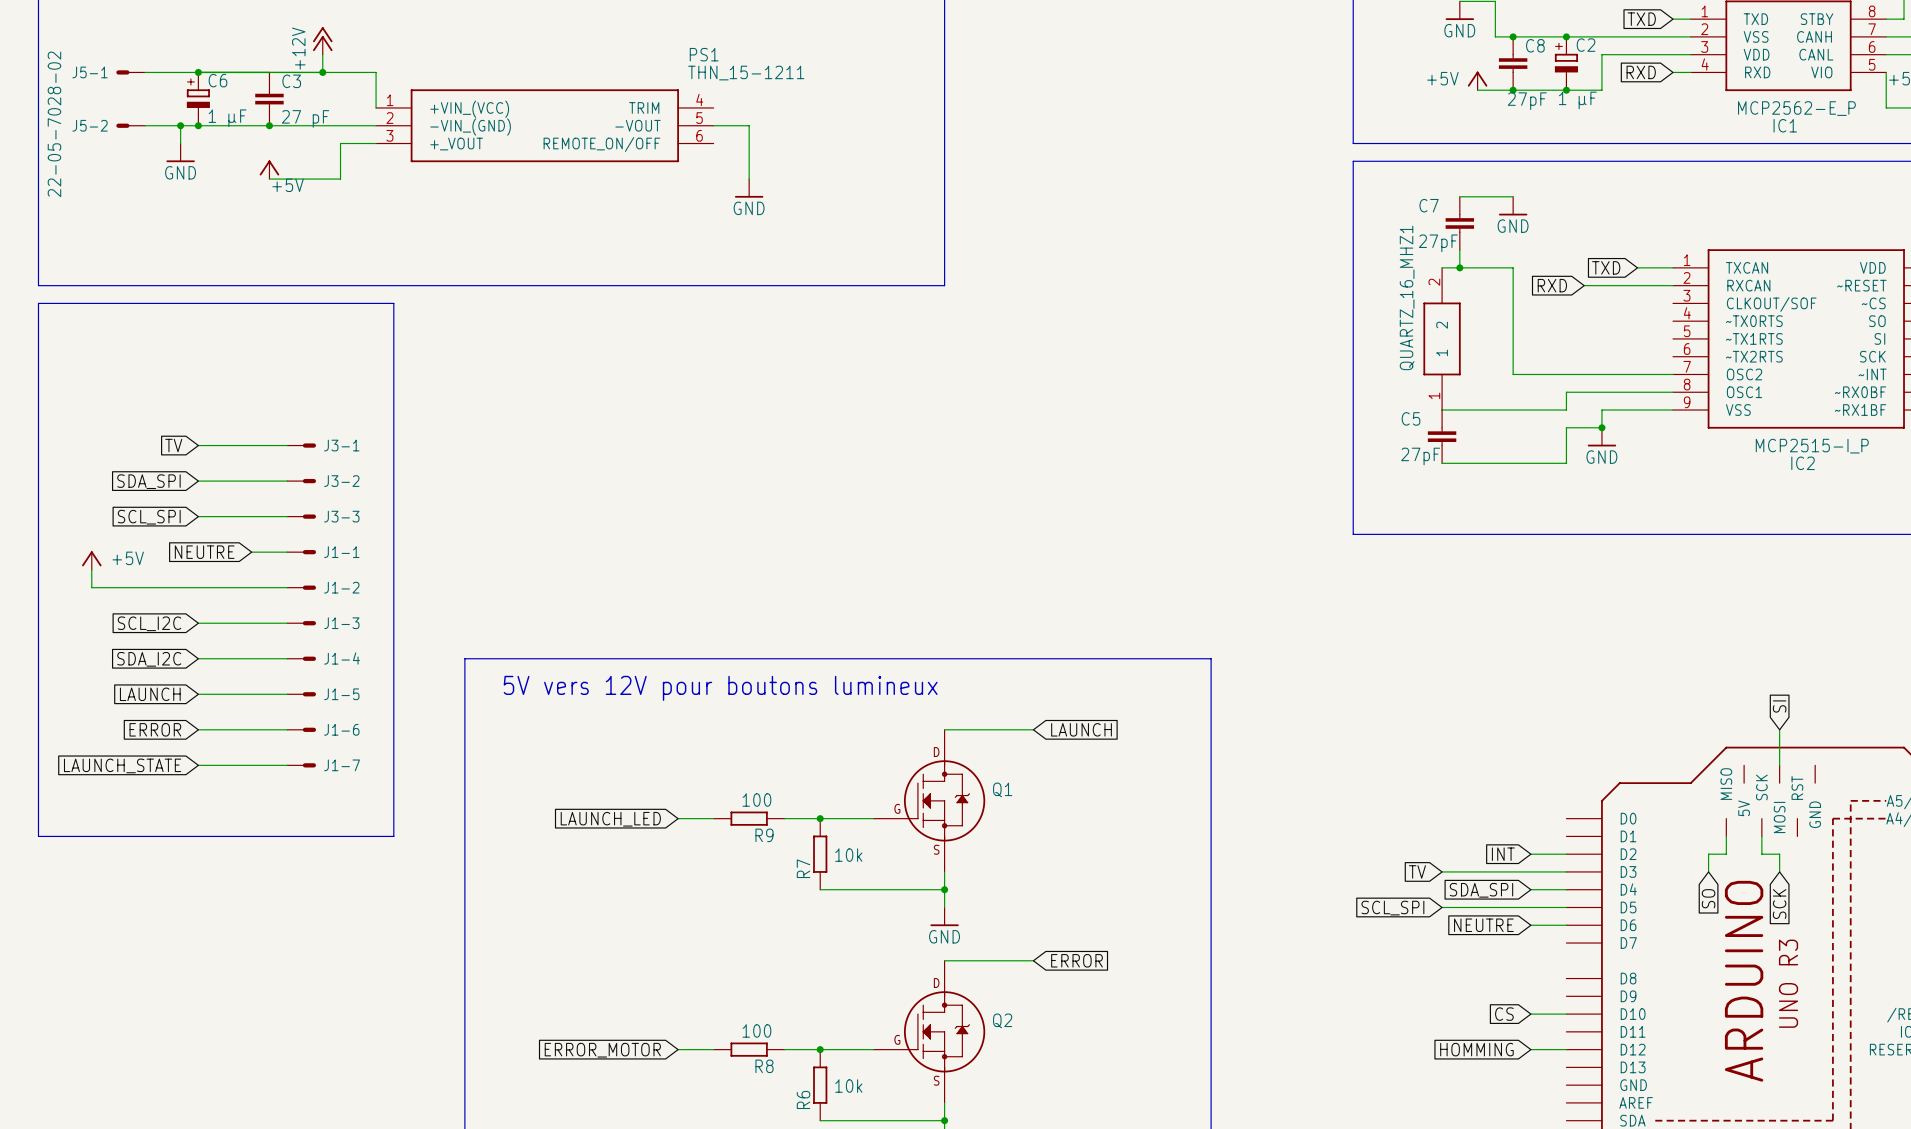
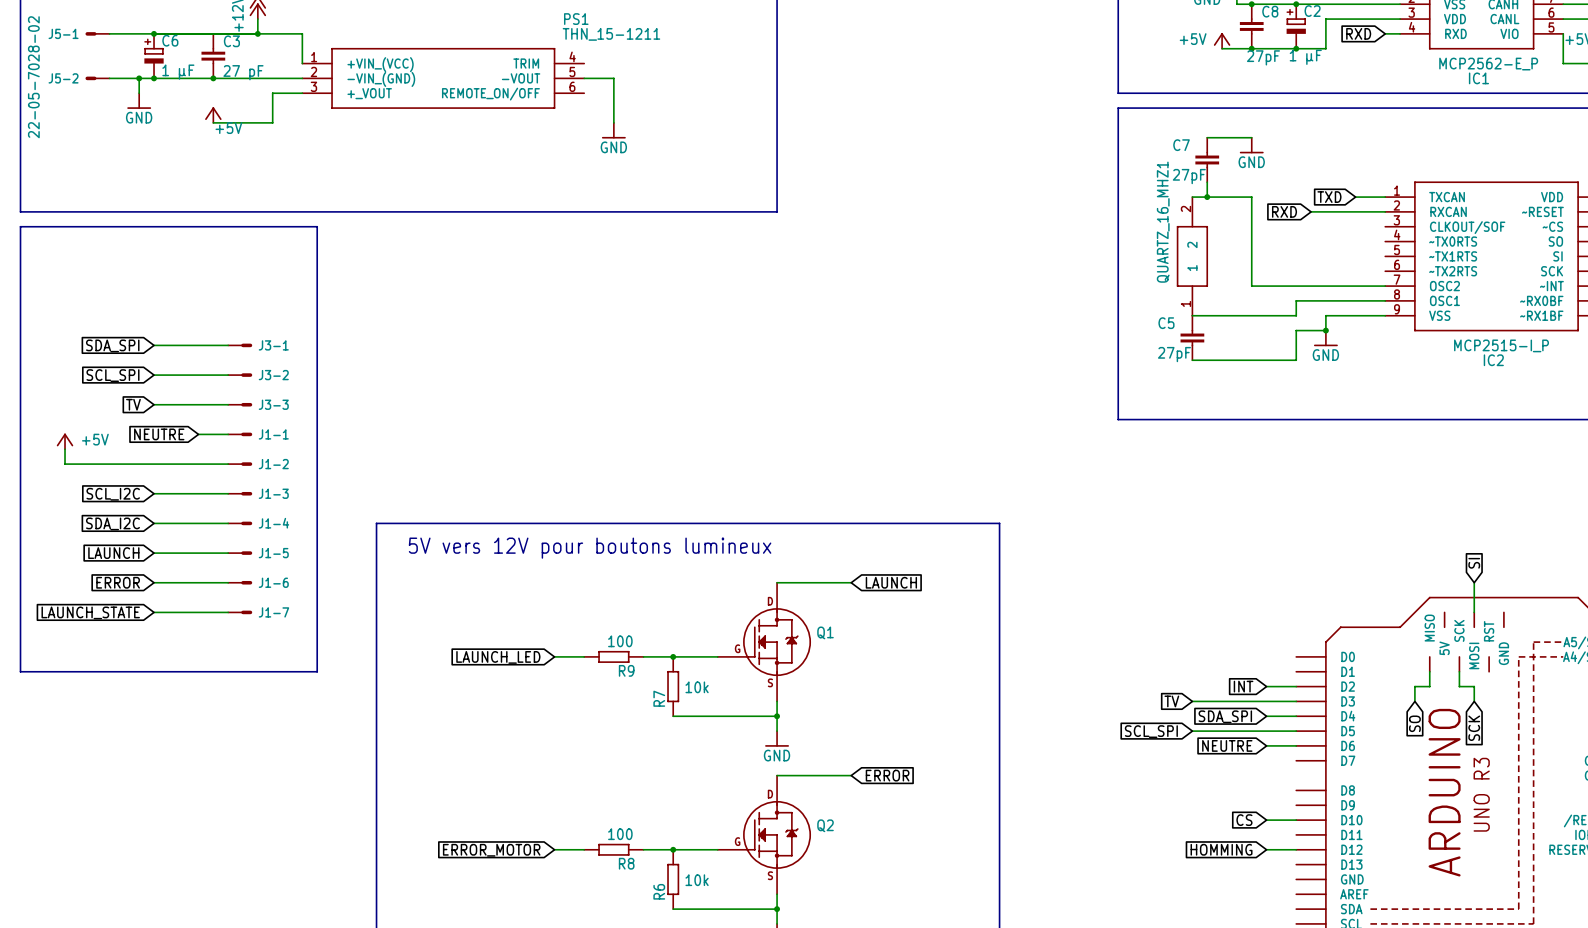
global label: TV (173, 445) -> SDA_SPI (112, 345)
global label: SDA_SPI (148, 481) -> SCL_SPI (112, 375)
global label: SCL_SPI (149, 517) -> TV (133, 404)

